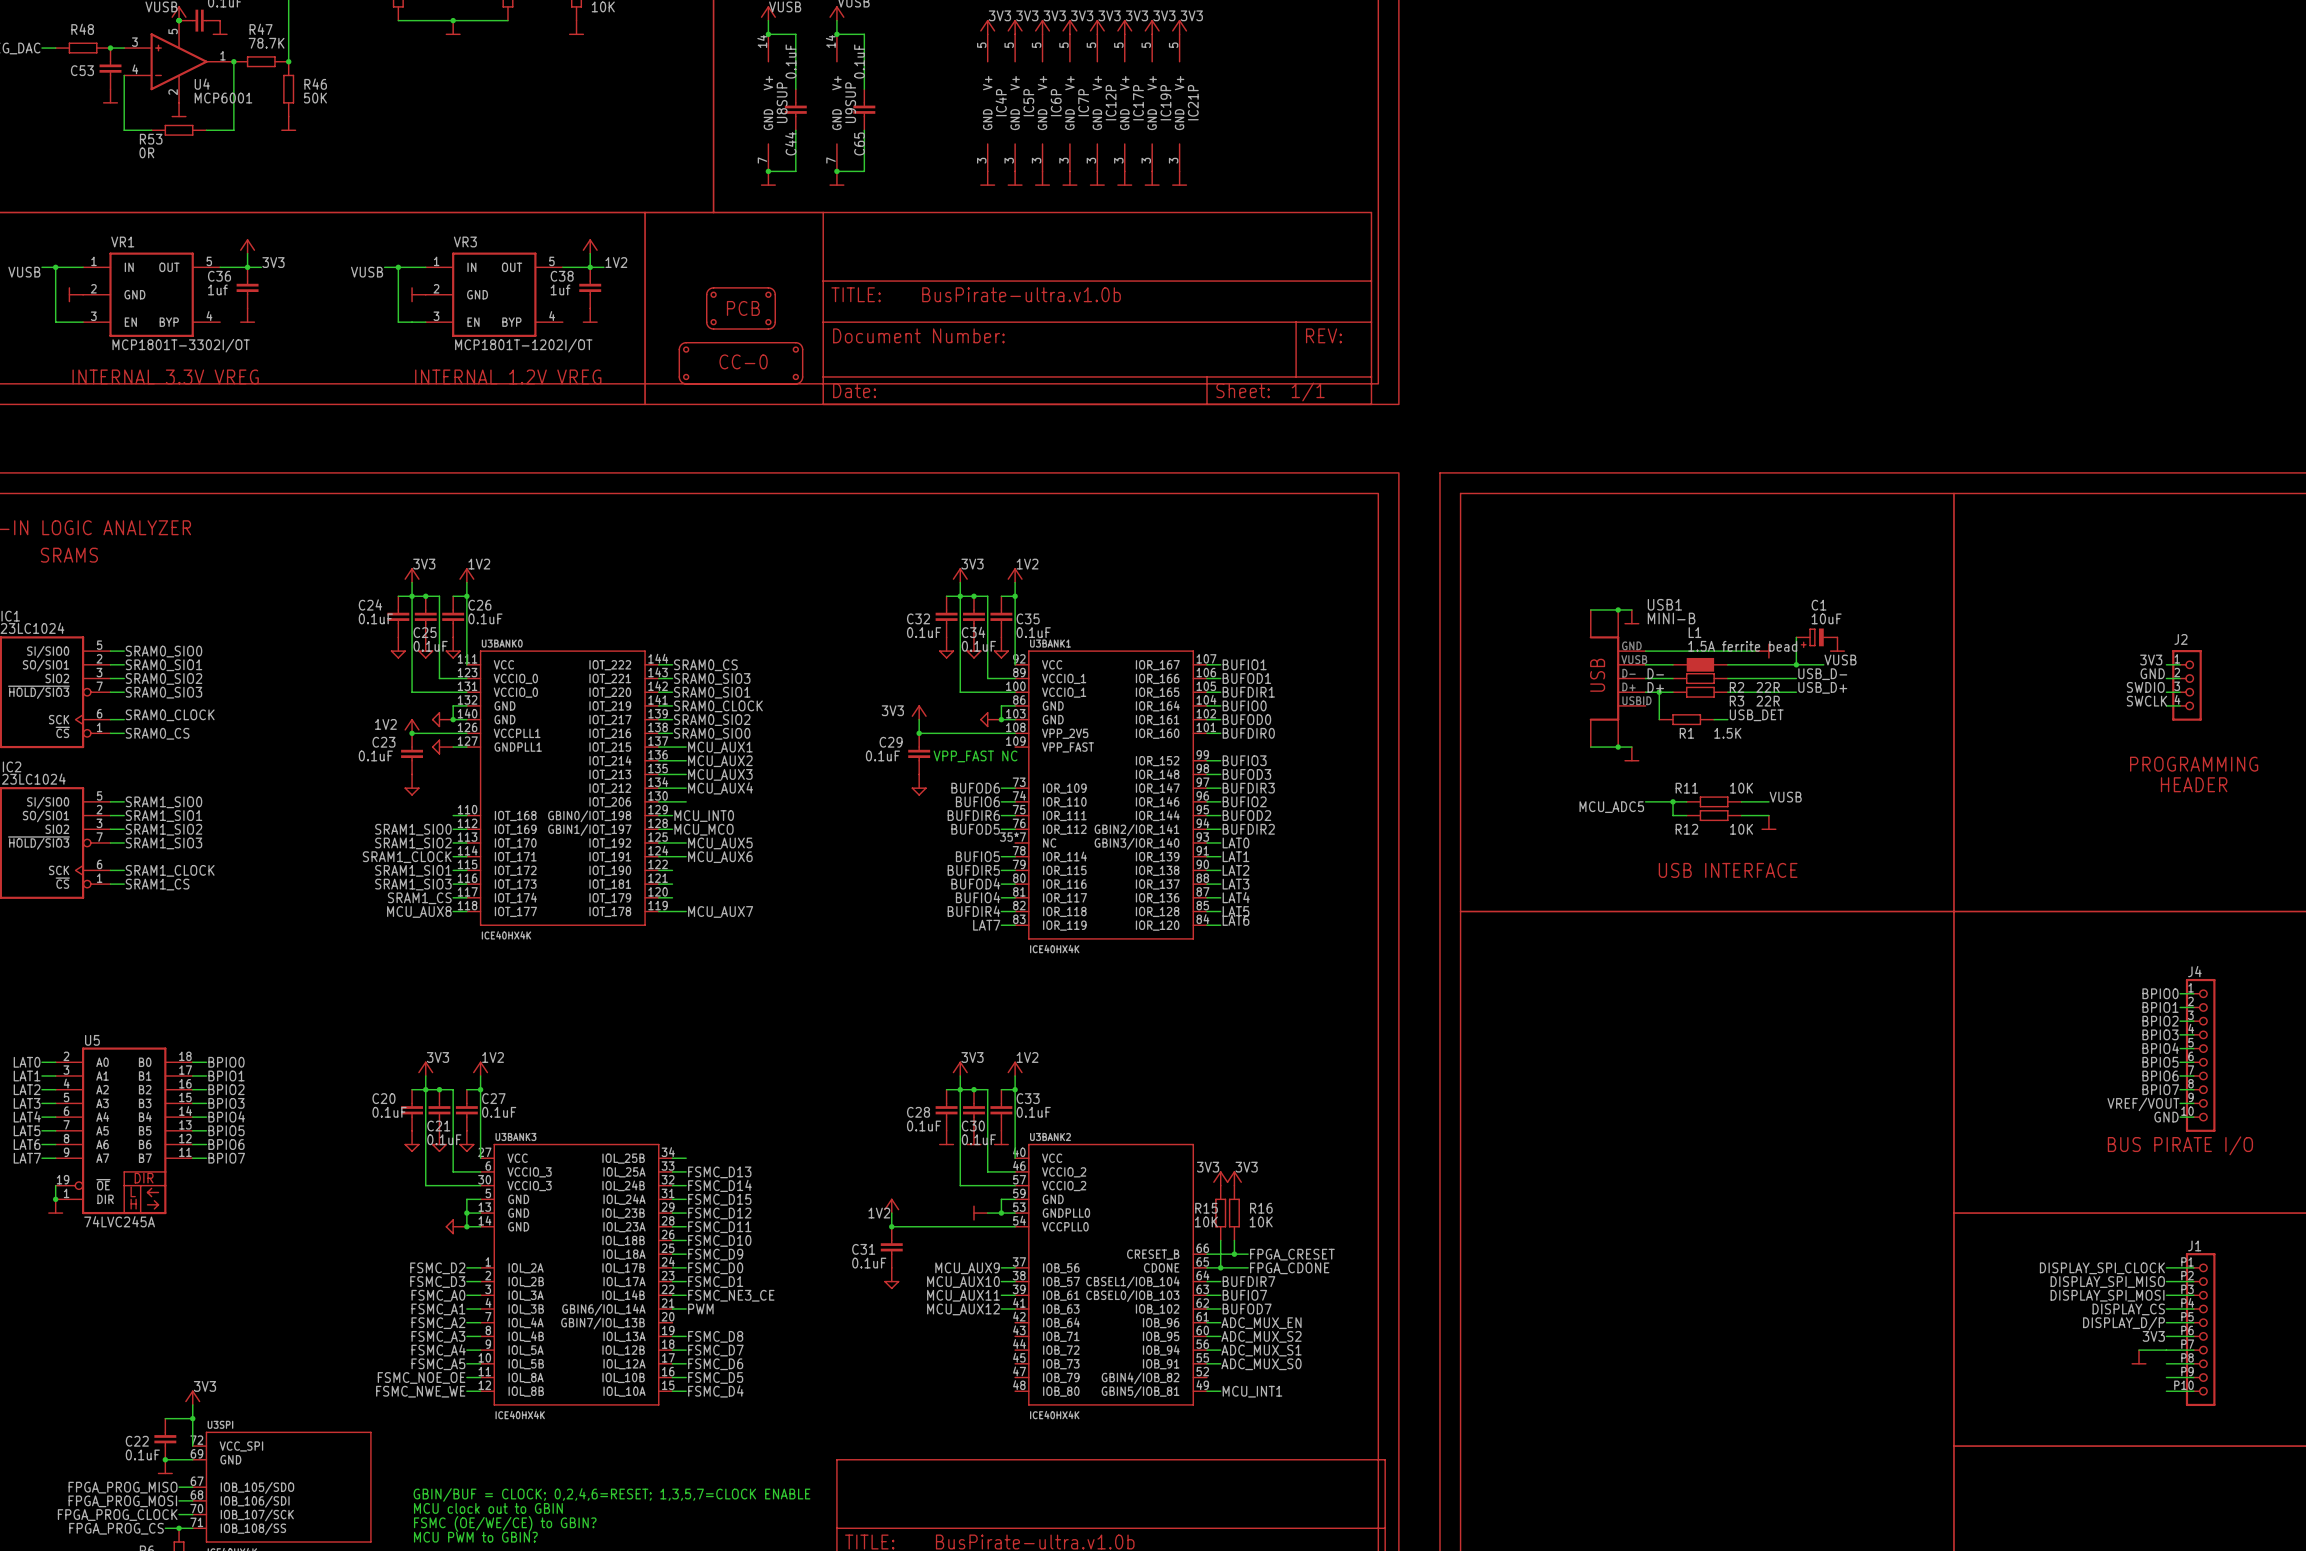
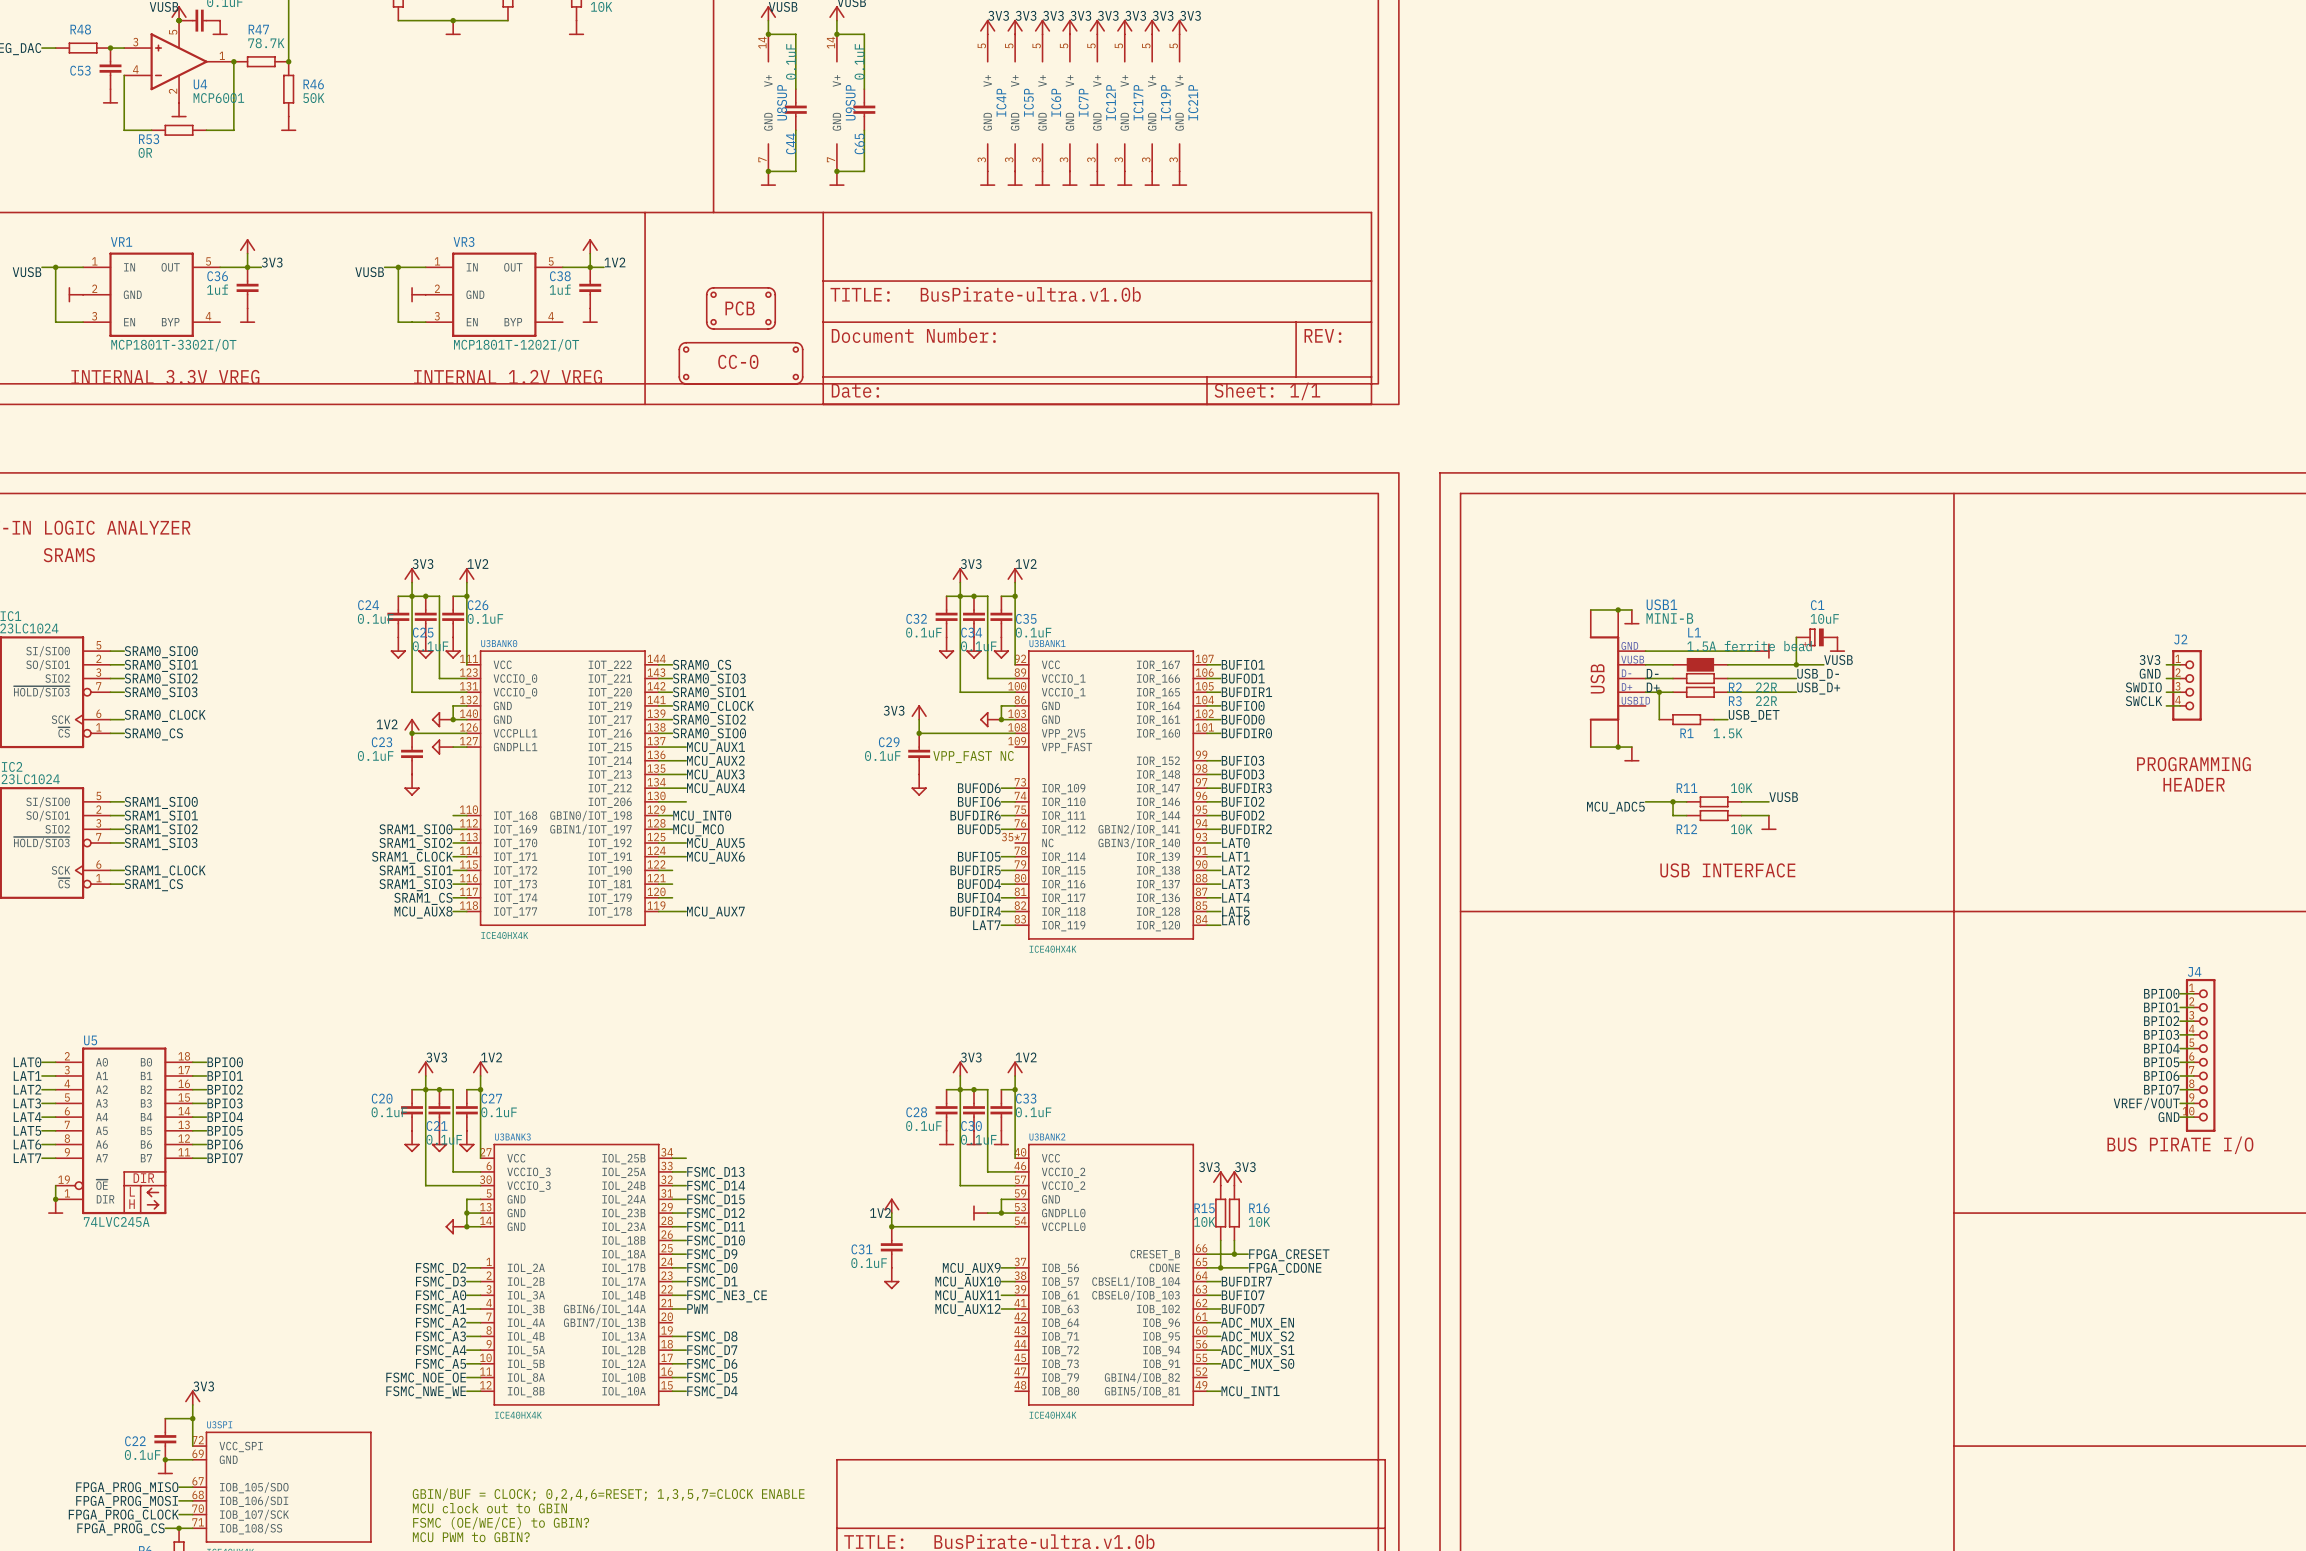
wire: (2166, 1267) (2193, 1267) -> none
label: DISPLAY_SPI_CLOCK (2102, 1268) -> none
wire: (2166, 1281) (2193, 1281) -> none
label: DISPLAY_SPI_MISO (2107, 1282) -> none
label: DISPLAY_SPI_MOSI (2107, 1295) -> none
wire: (2166, 1295) (2193, 1295) -> none
wire: (2166, 1308) (2193, 1308) -> none
label: DISPLAY_CS (2128, 1309) -> none
wire: (2166, 1322) (2193, 1322) -> none
label: DISPLAY_D/P (2123, 1323) -> none
J1: (2200, 1329) -> none
label: 3V3 (2153, 1336) -> none
wire: (2166, 1336) (2193, 1336) -> none
wire: (2139, 1350) (2193, 1350) -> none
power symbol: (2139, 1357) -> none
wire: (2166, 1363) (2193, 1363) -> none
wire: (2166, 1377) (2193, 1377) -> none
wire: (2166, 1391) (2193, 1391) -> none

